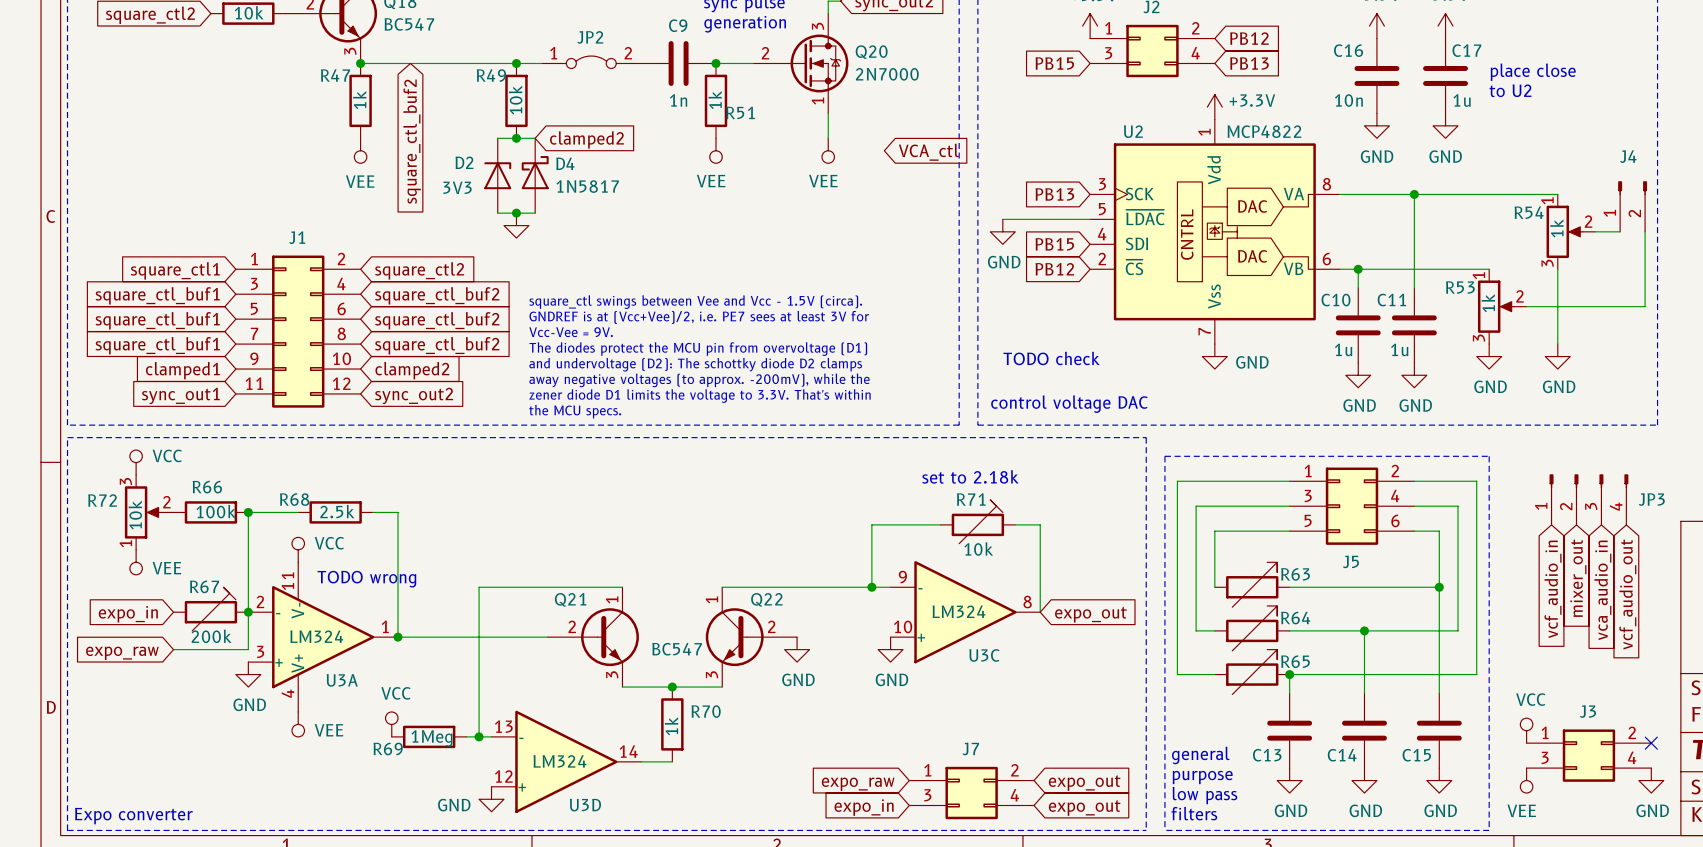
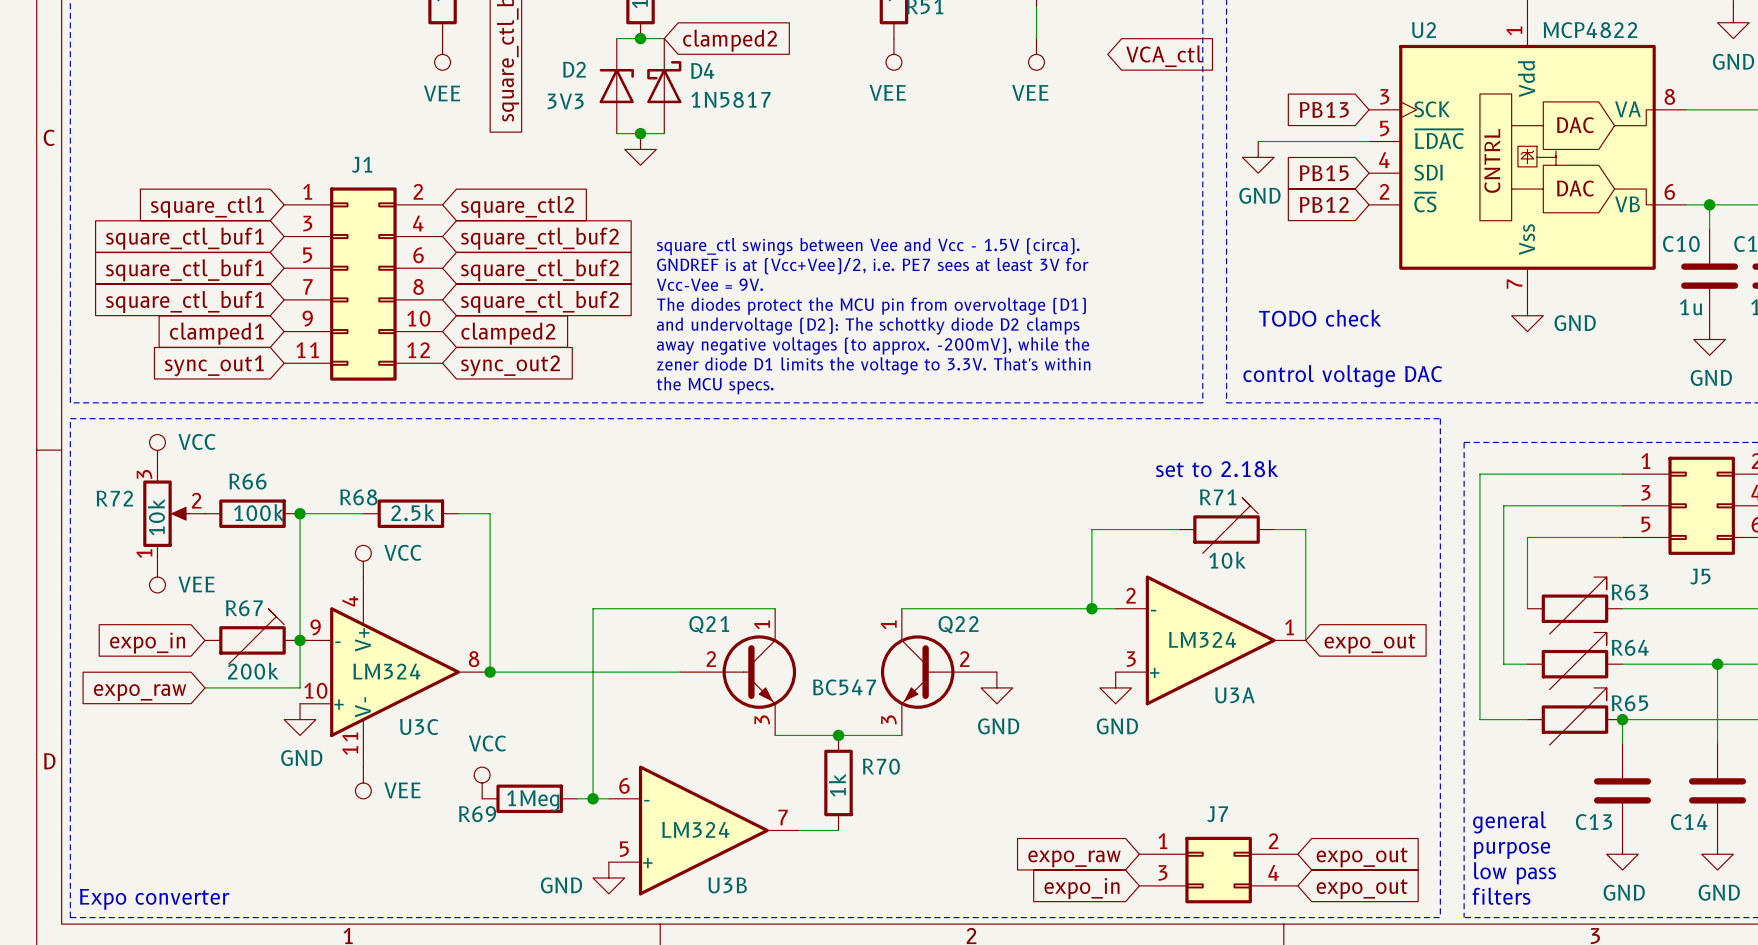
text: TODO wrong (366, 579) -> none
U3C position: (965, 612) -> (395, 672)
part rotation: 0° (298, 637) -> 180° (363, 672)
U3A position: (323, 637) -> (1210, 640)
U3D pin number: 13 (503, 726) -> 6 (624, 785)
U3D pin number: 14 (628, 751) -> 7 (783, 817)
U3D pin number: 12 (503, 776) -> 5 (624, 849)
U3D name: U3D (585, 805) -> U3B (727, 885)

